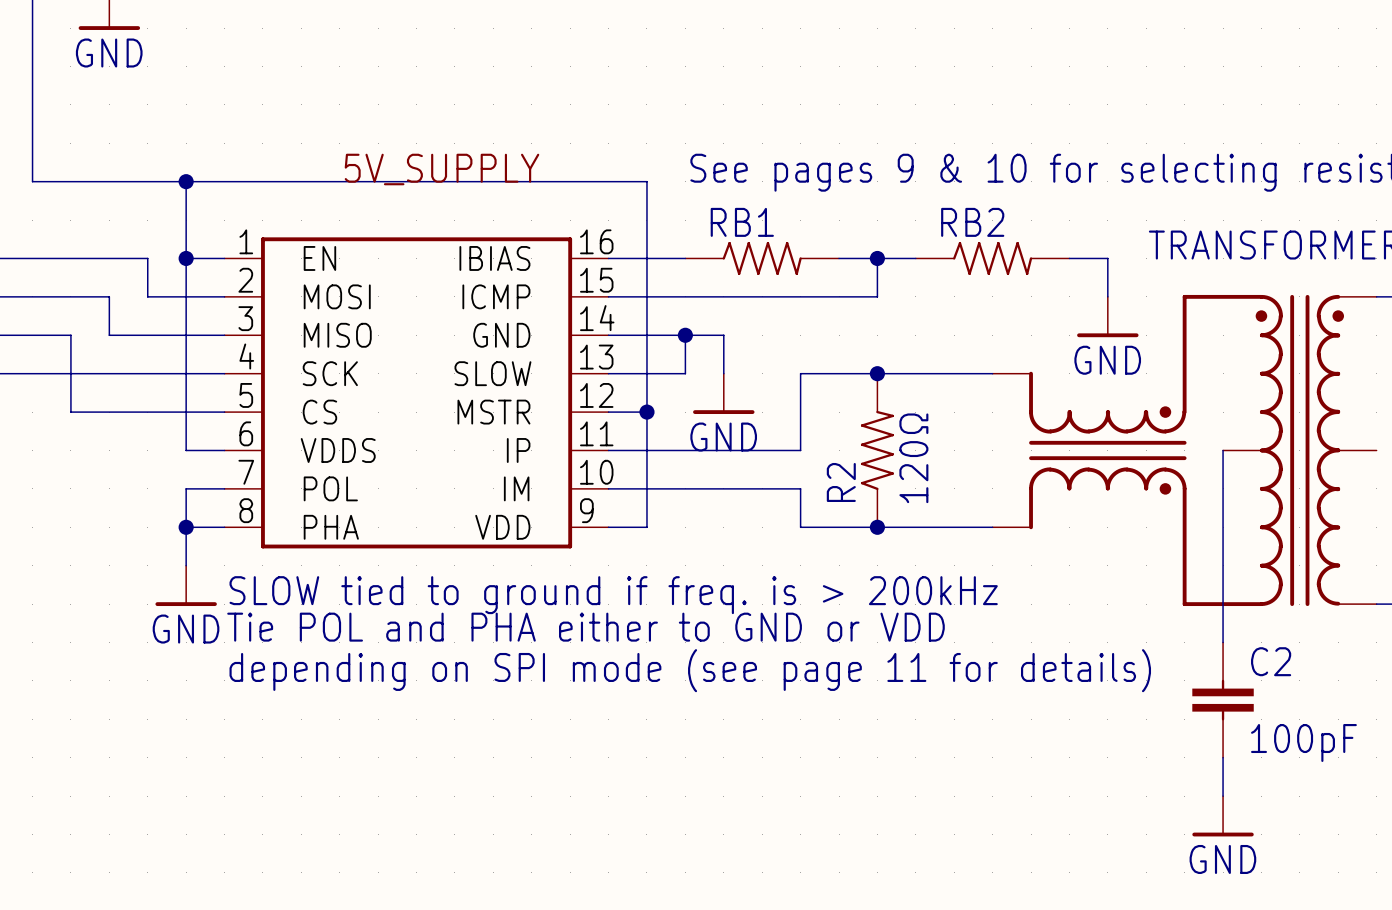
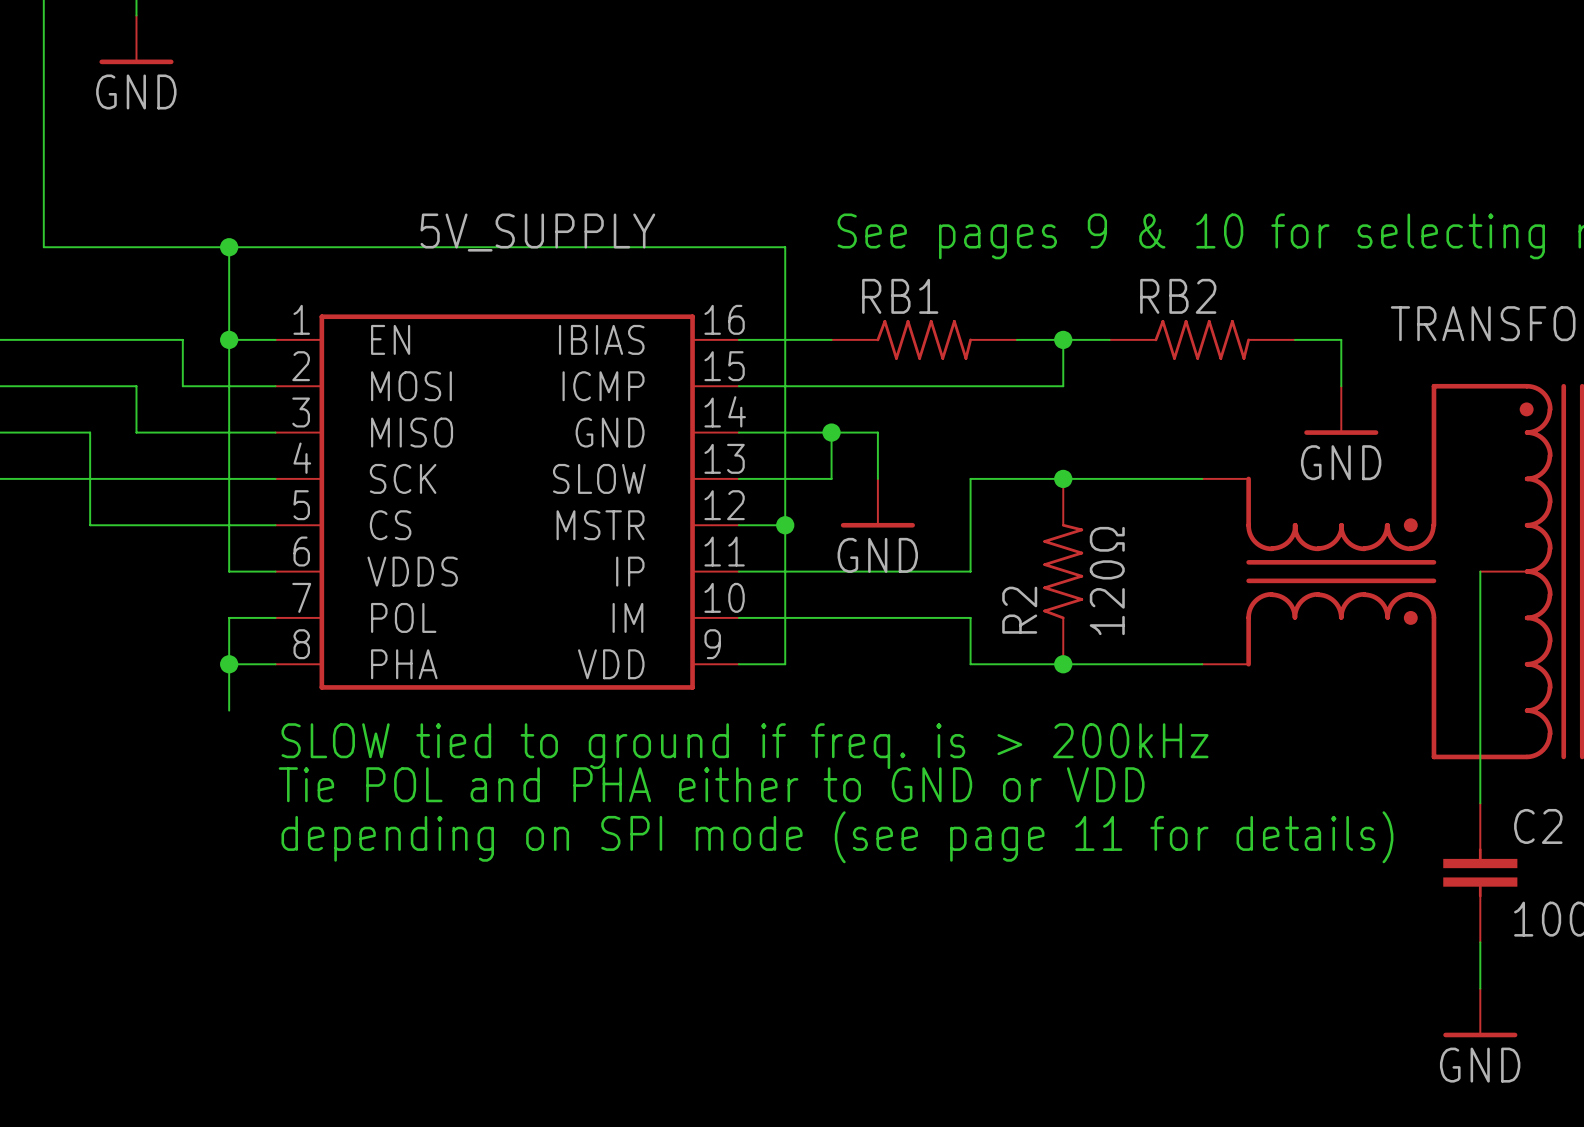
power symbol: GND (186, 585) -> none

